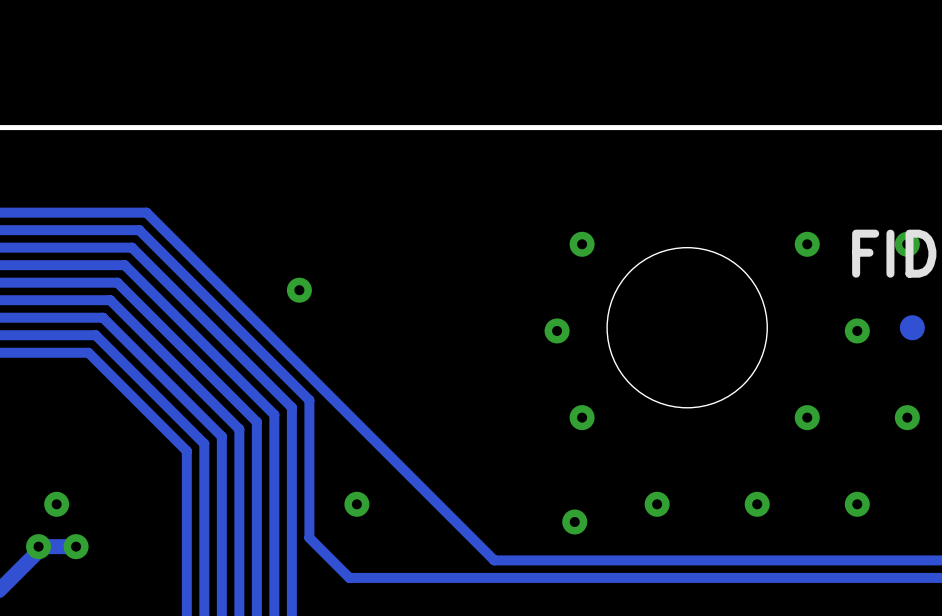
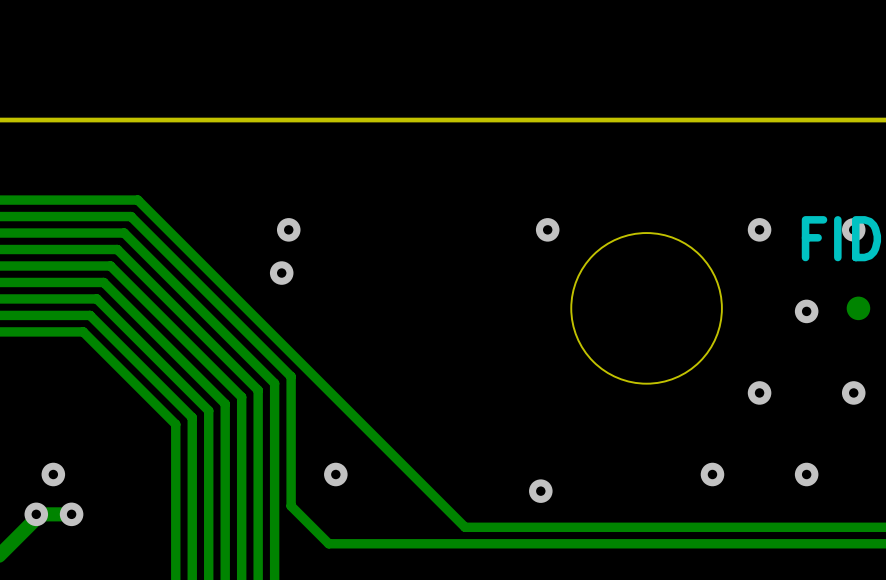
via: none -> (288, 229)
via: (557, 330) -> none
via: (582, 417) -> none
via: (657, 504) -> none

